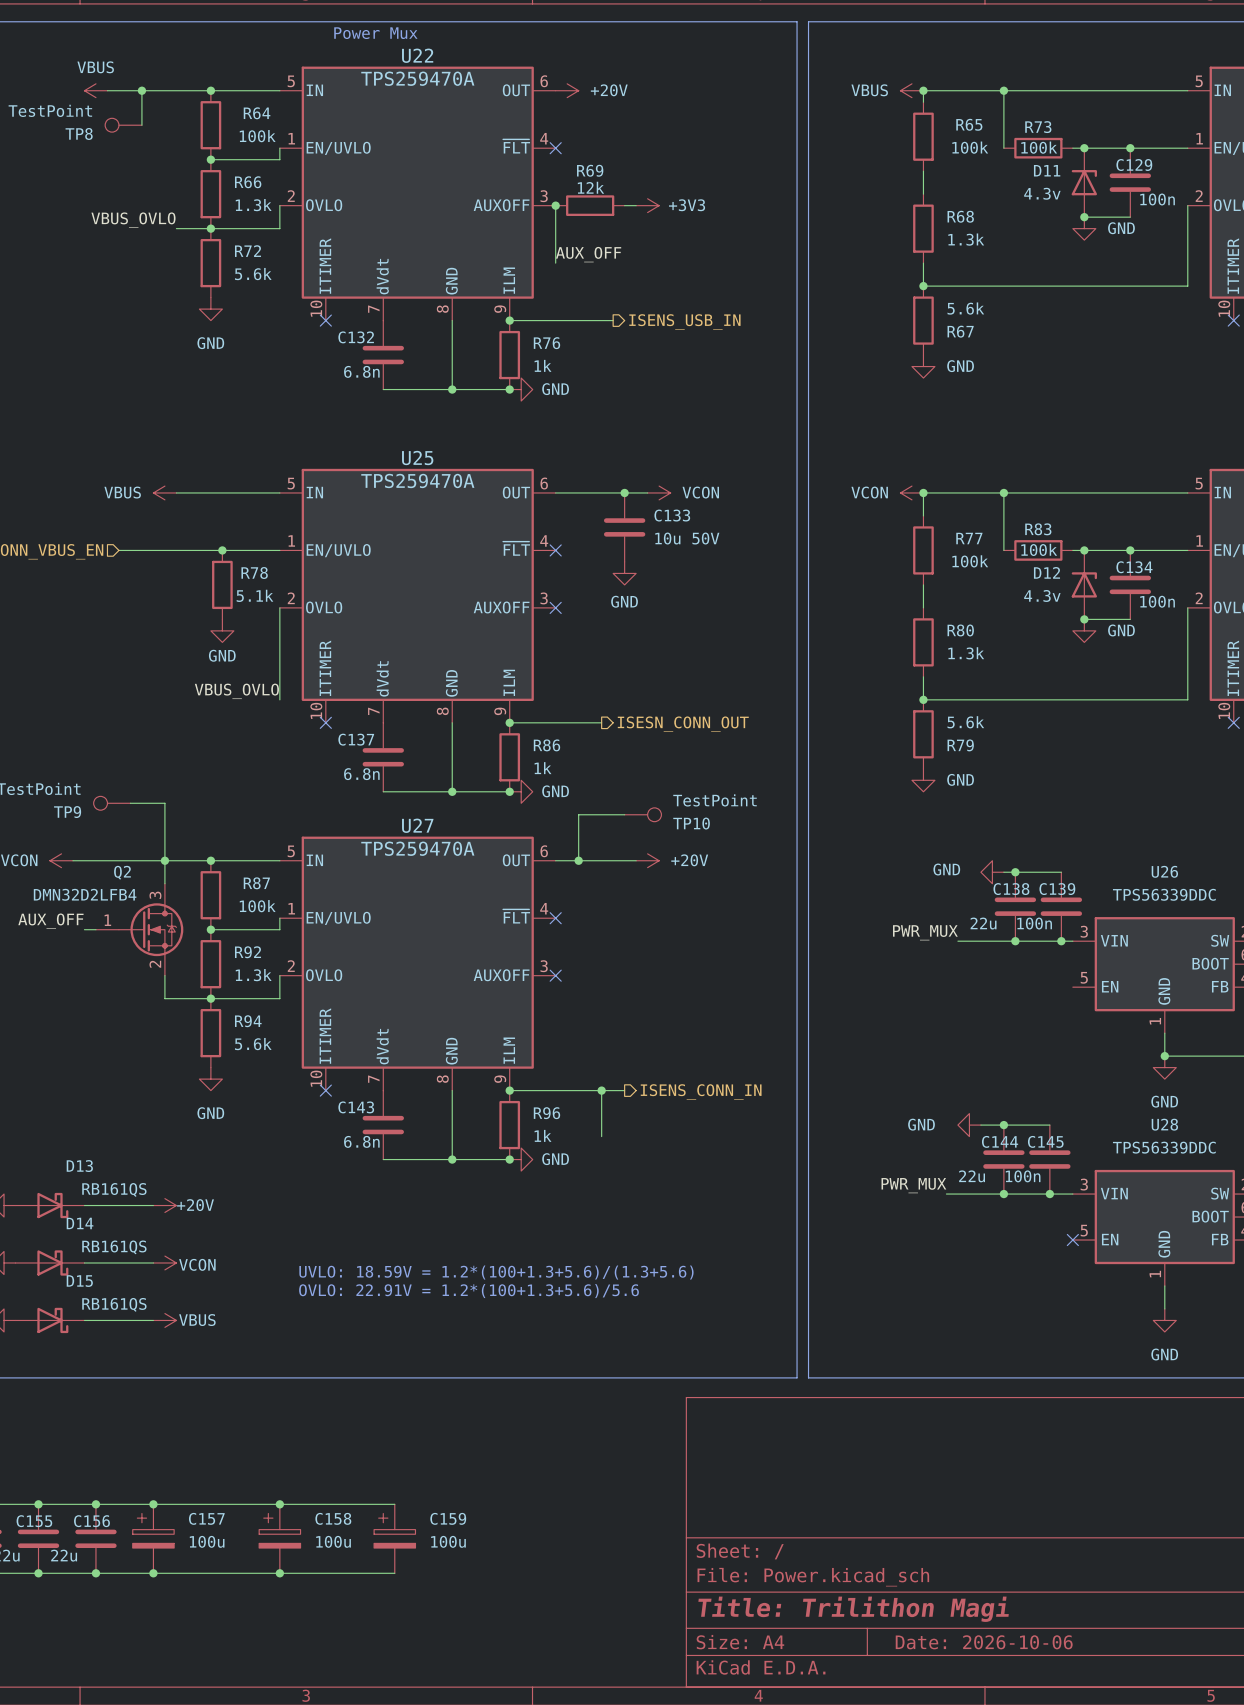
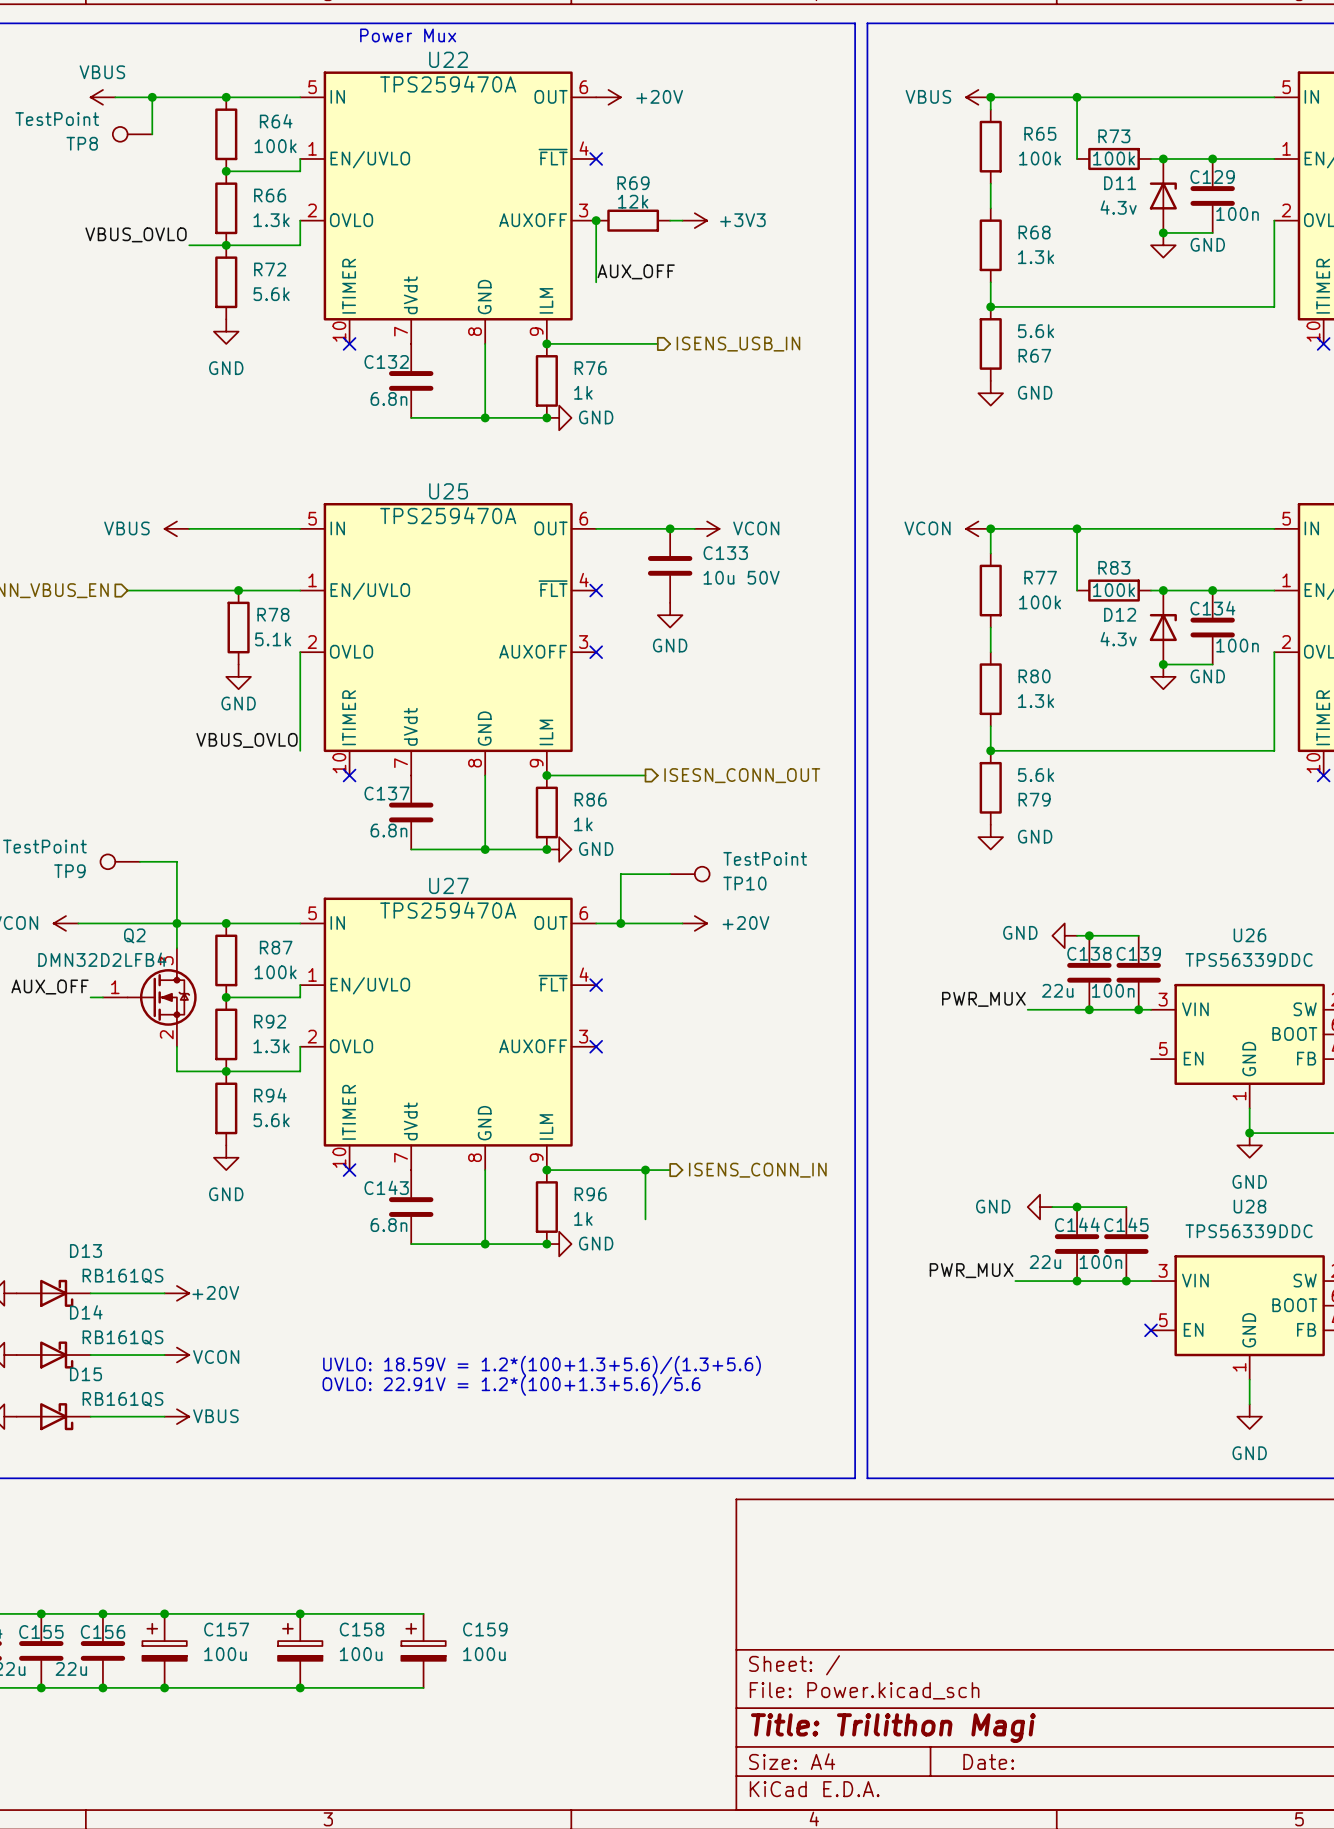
title block: Date: 2026-10-06 (984, 1642) -> Date: (988, 1761)

